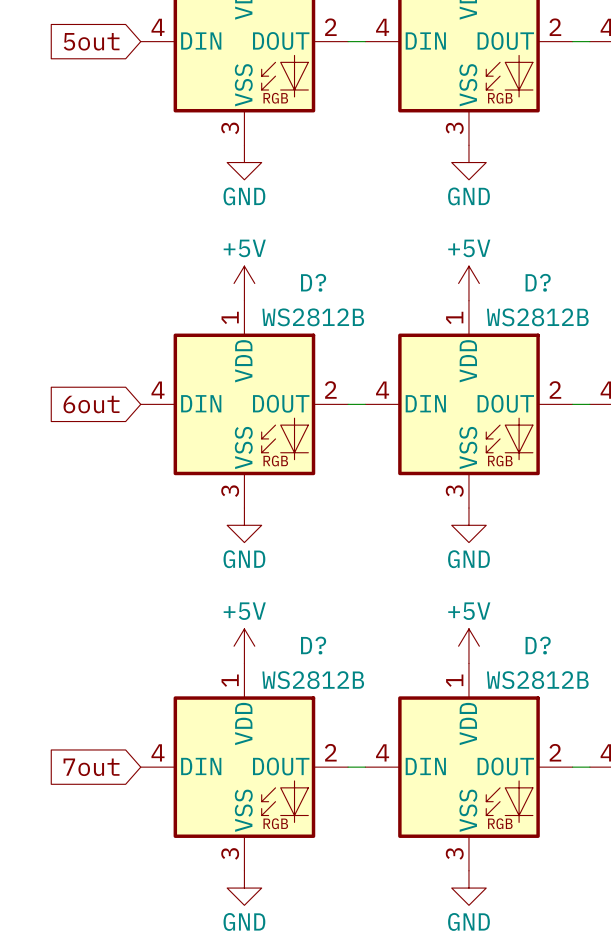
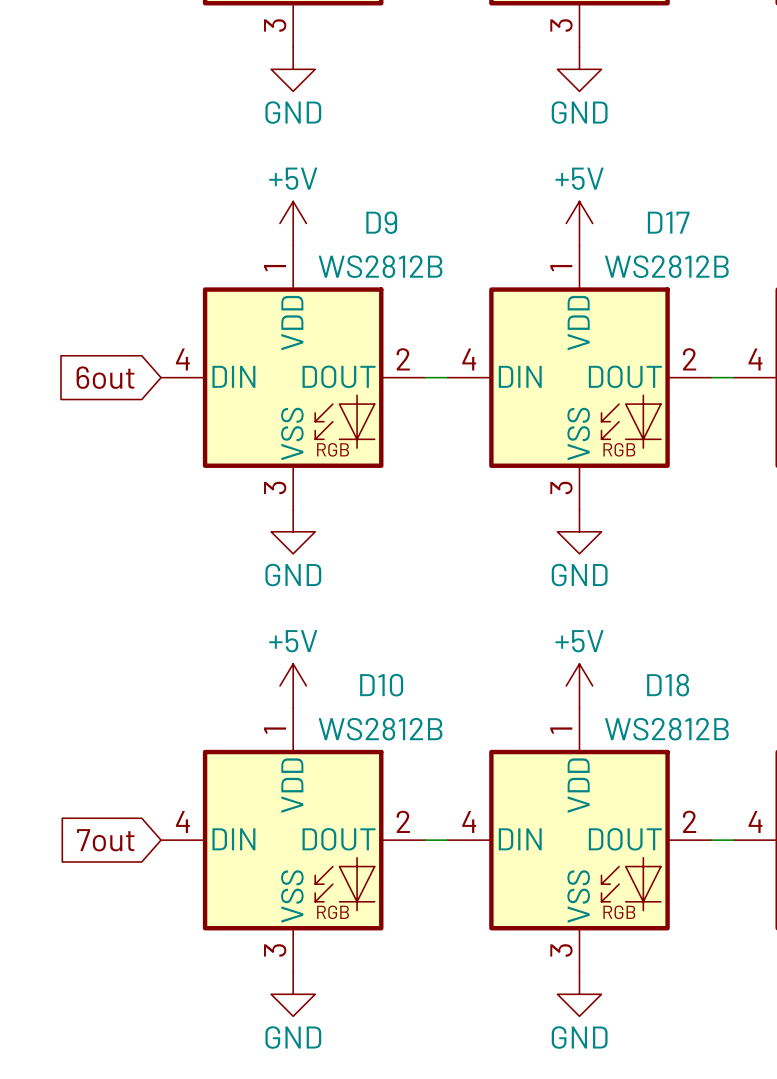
D? name: D? (313, 282) -> D9 (381, 222)
D? name: D? (538, 282) -> D17 (668, 222)
D? name: D? (313, 645) -> D10 (381, 685)
D? name: D? (538, 645) -> D18 (668, 685)

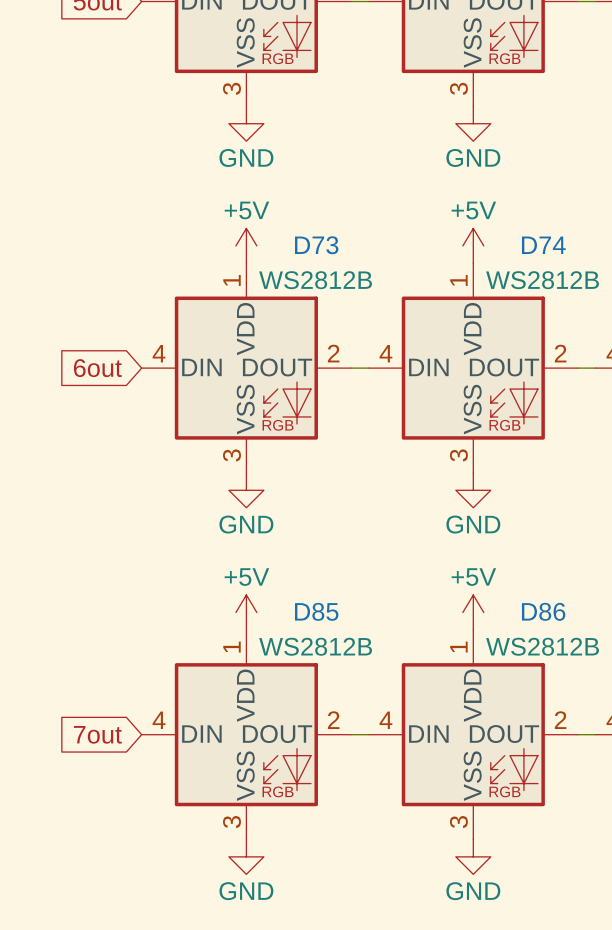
D9 name: D9 (381, 222) -> D73 (316, 245)
D17 name: D17 (668, 222) -> D74 (543, 245)
D10 name: D10 (381, 685) -> D85 (316, 611)
D18 name: D18 (668, 685) -> D86 (543, 611)

